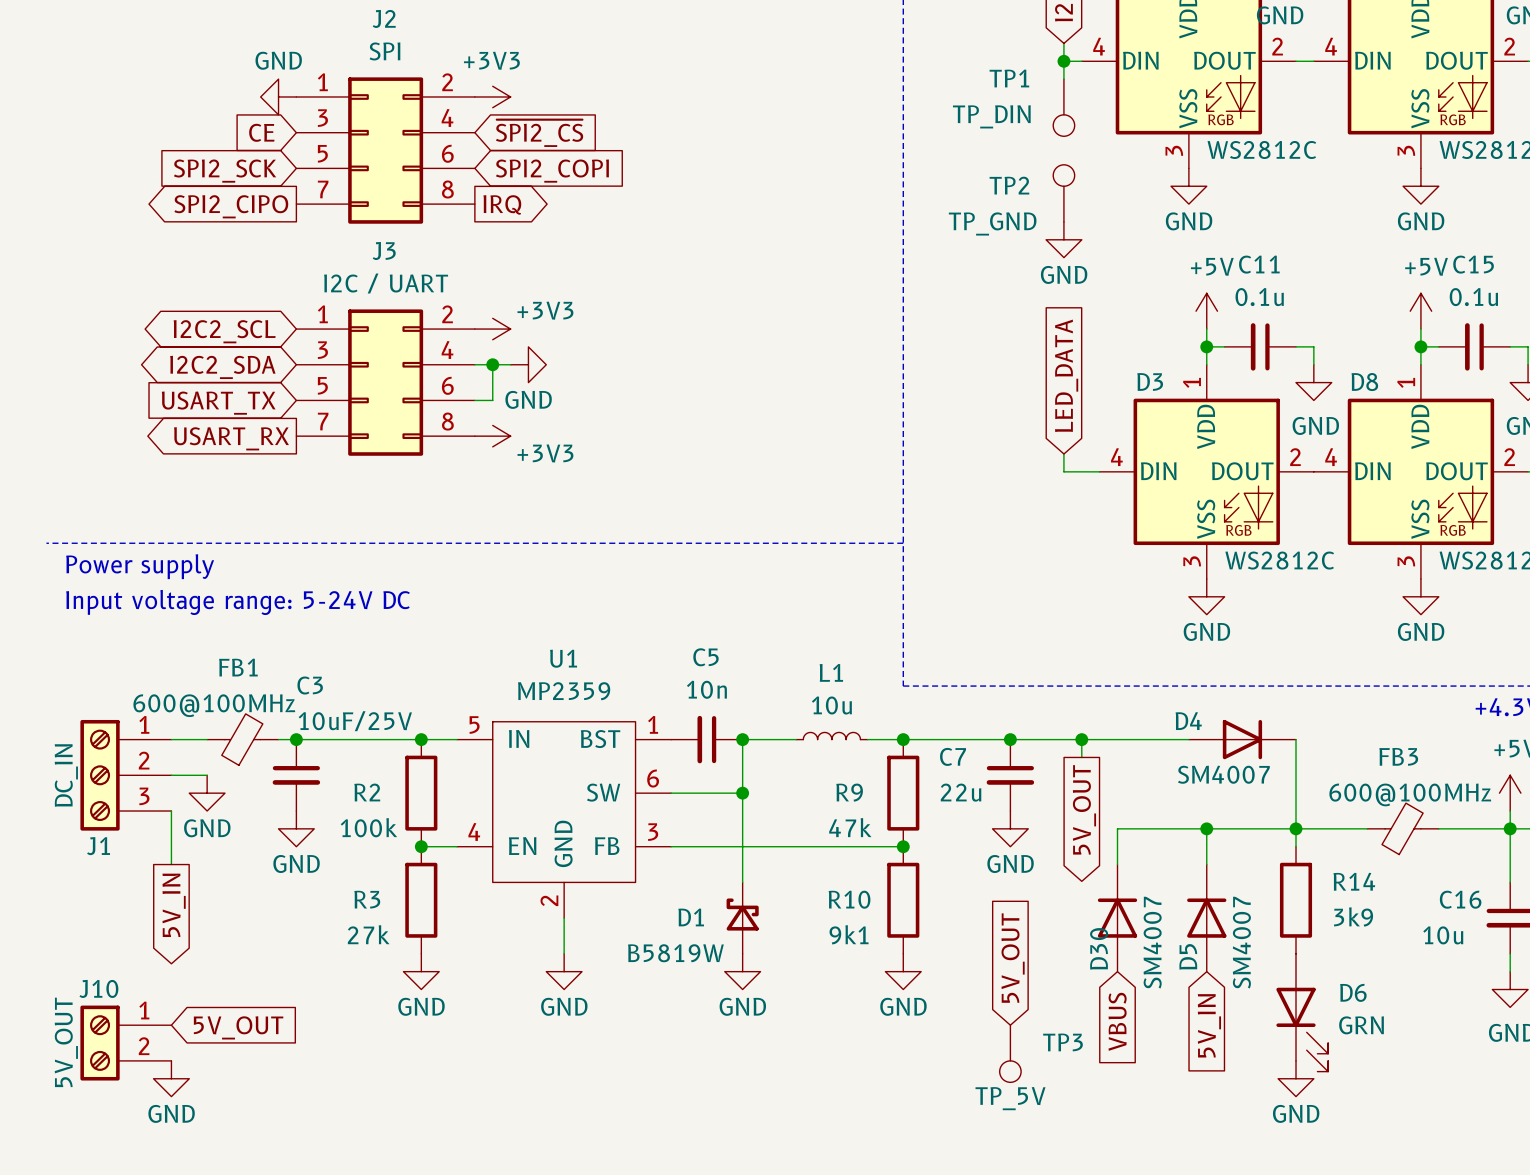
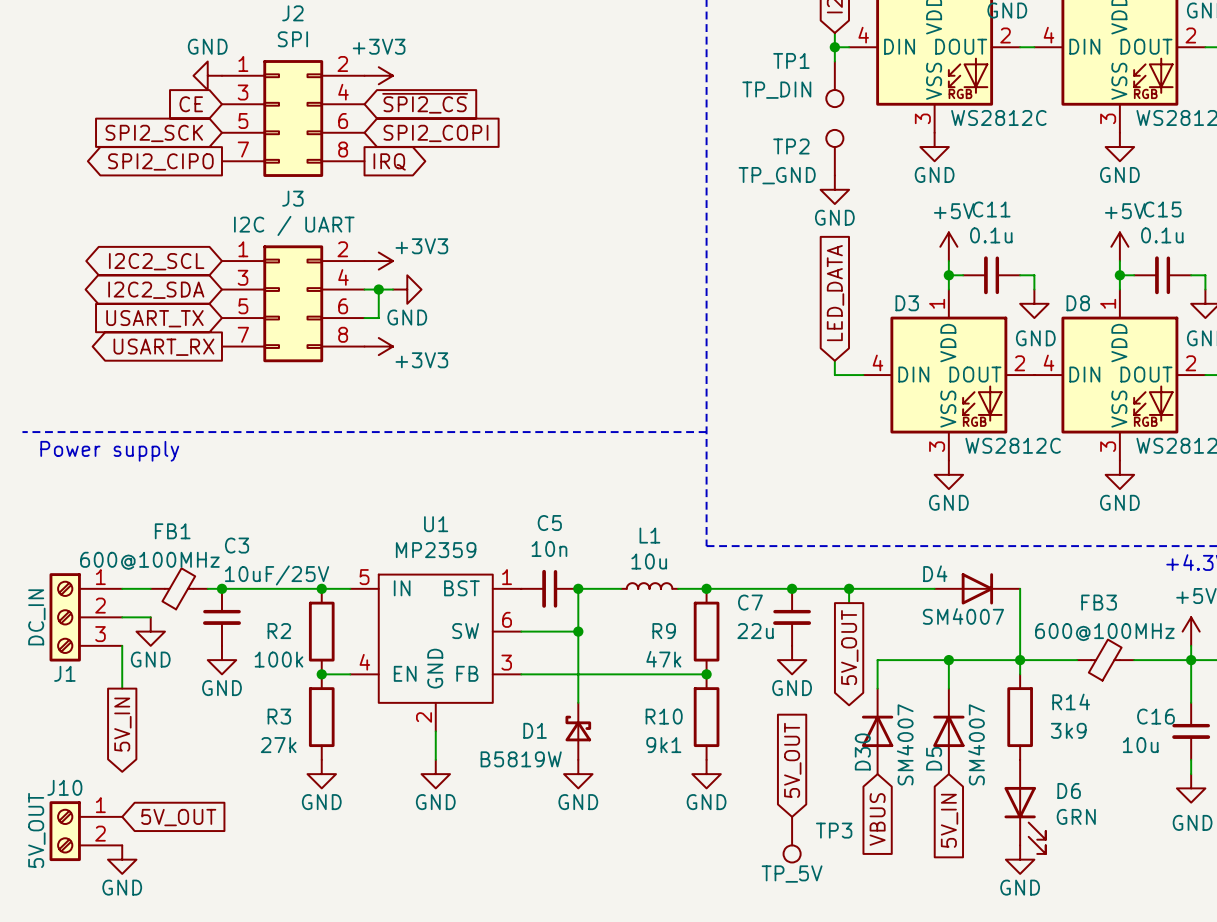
text: Input voltage range: 5-24V DC (238, 602) -> none

